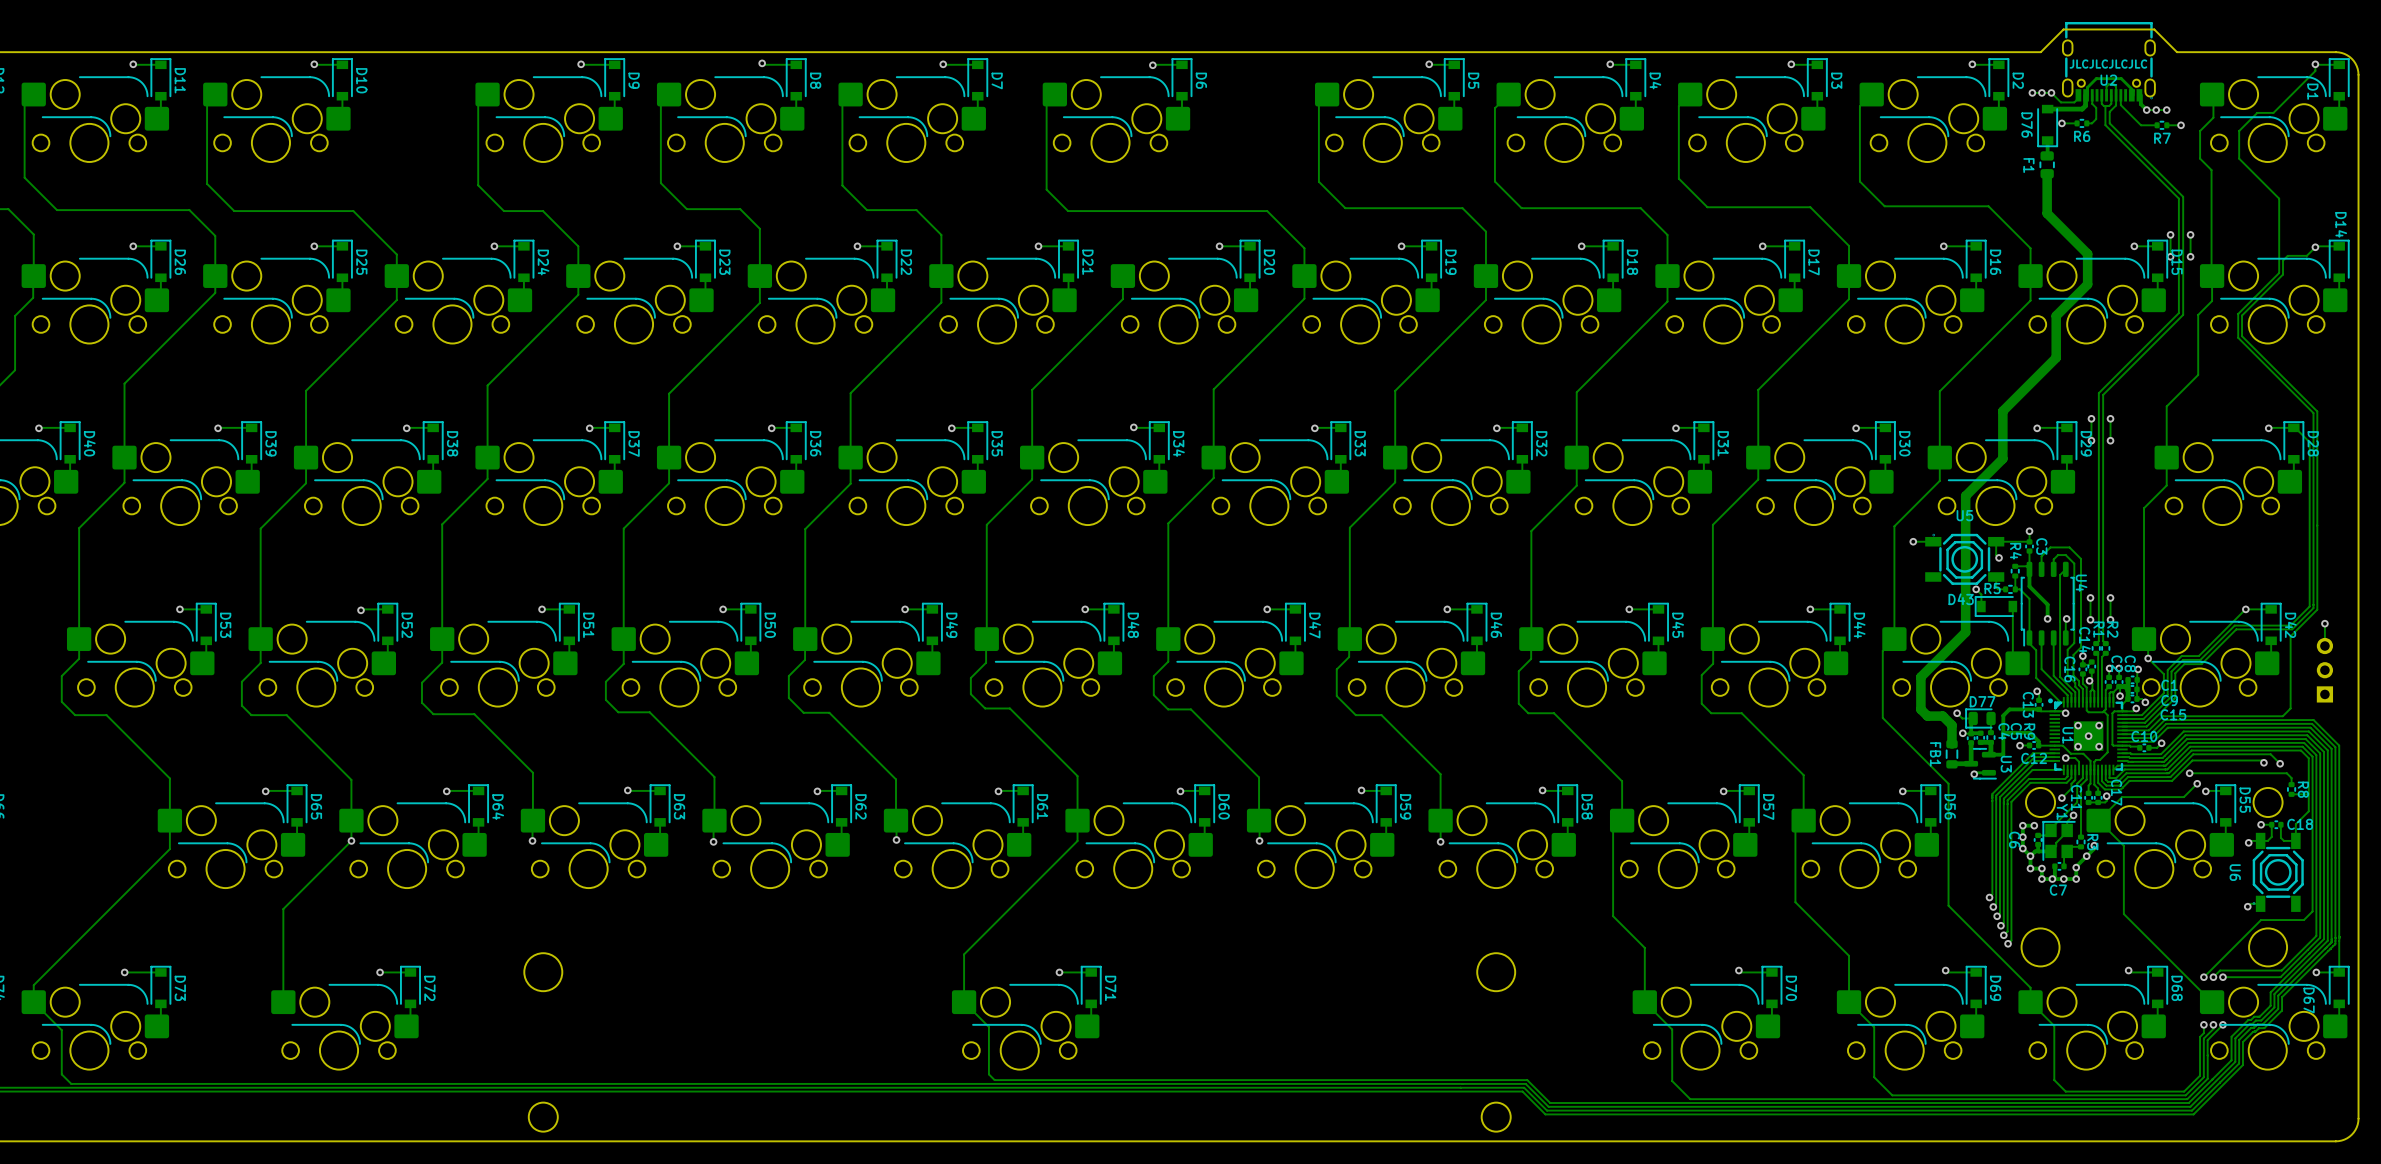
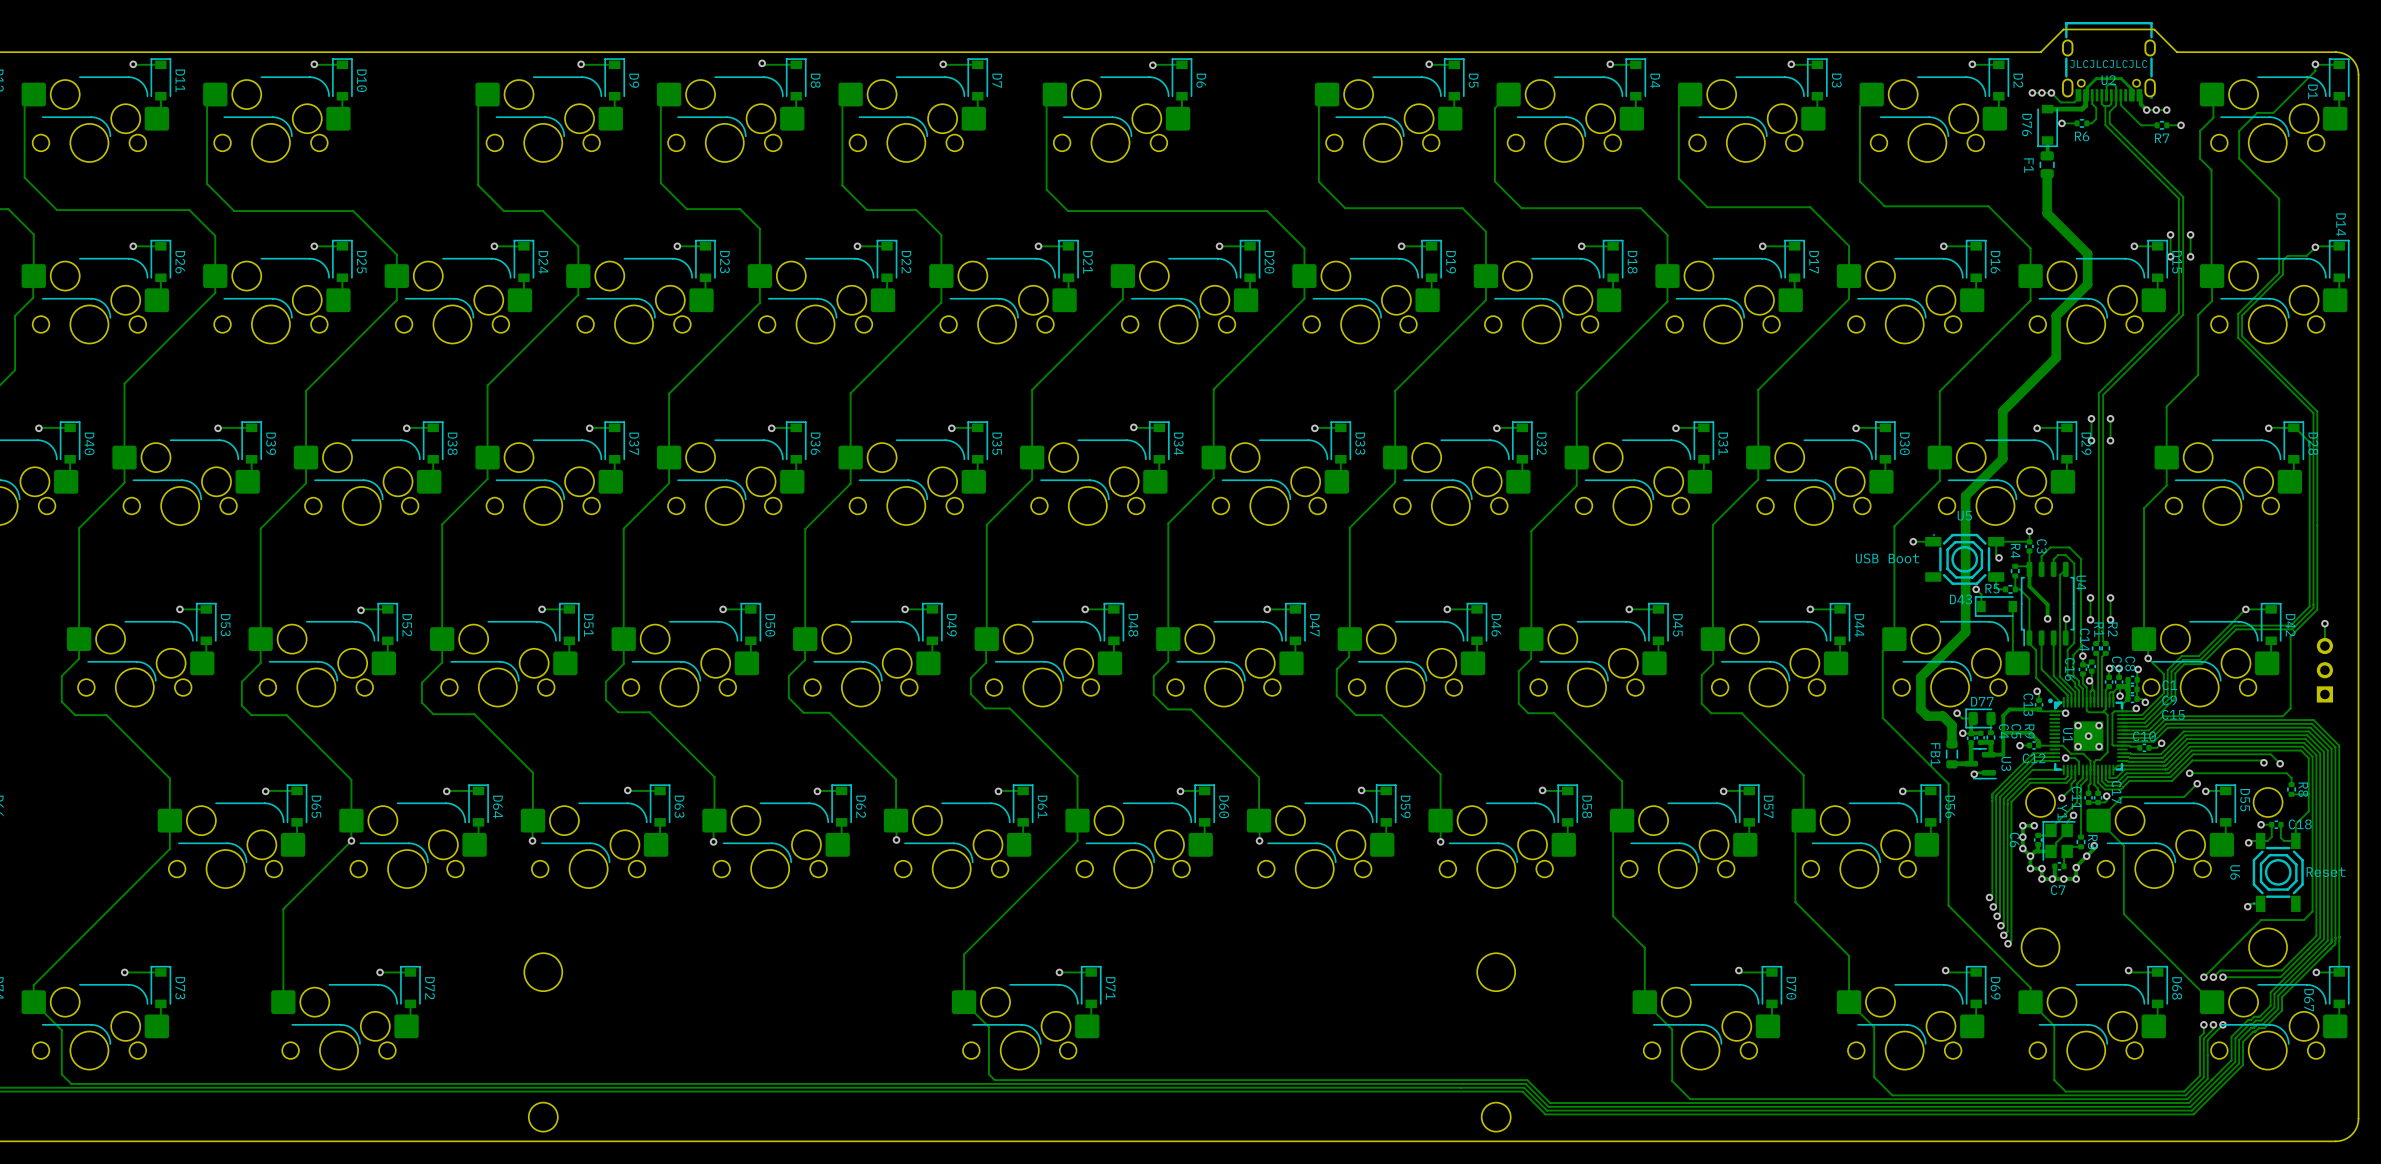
U5 value: none -> USB Boot (1887, 558)
U6 value: none -> Reset (2325, 872)

